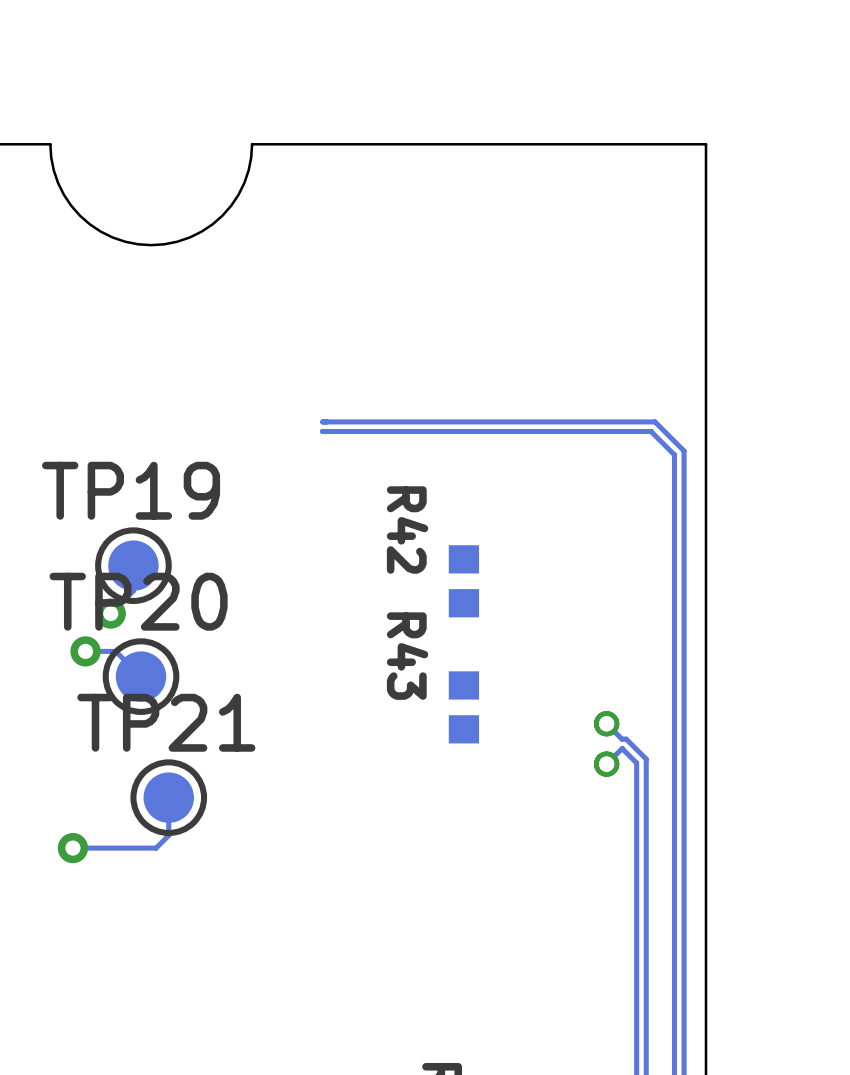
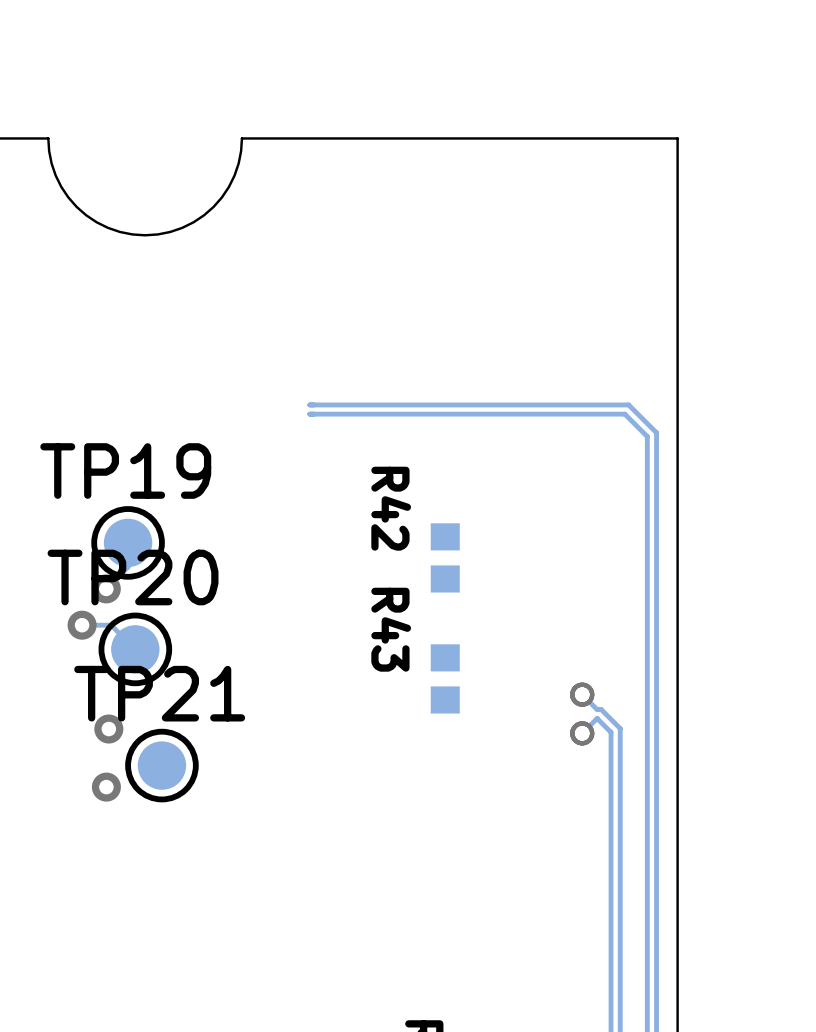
via: none -> (108, 729)
track: (168, 797) (168, 835) (156, 848) (72, 848) -> none
via position: (72, 848) -> (106, 787)

